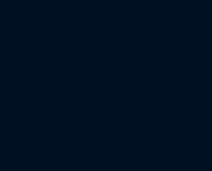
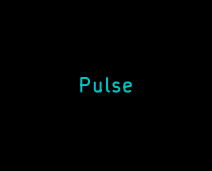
text: none -> Pulse (106, 84)

